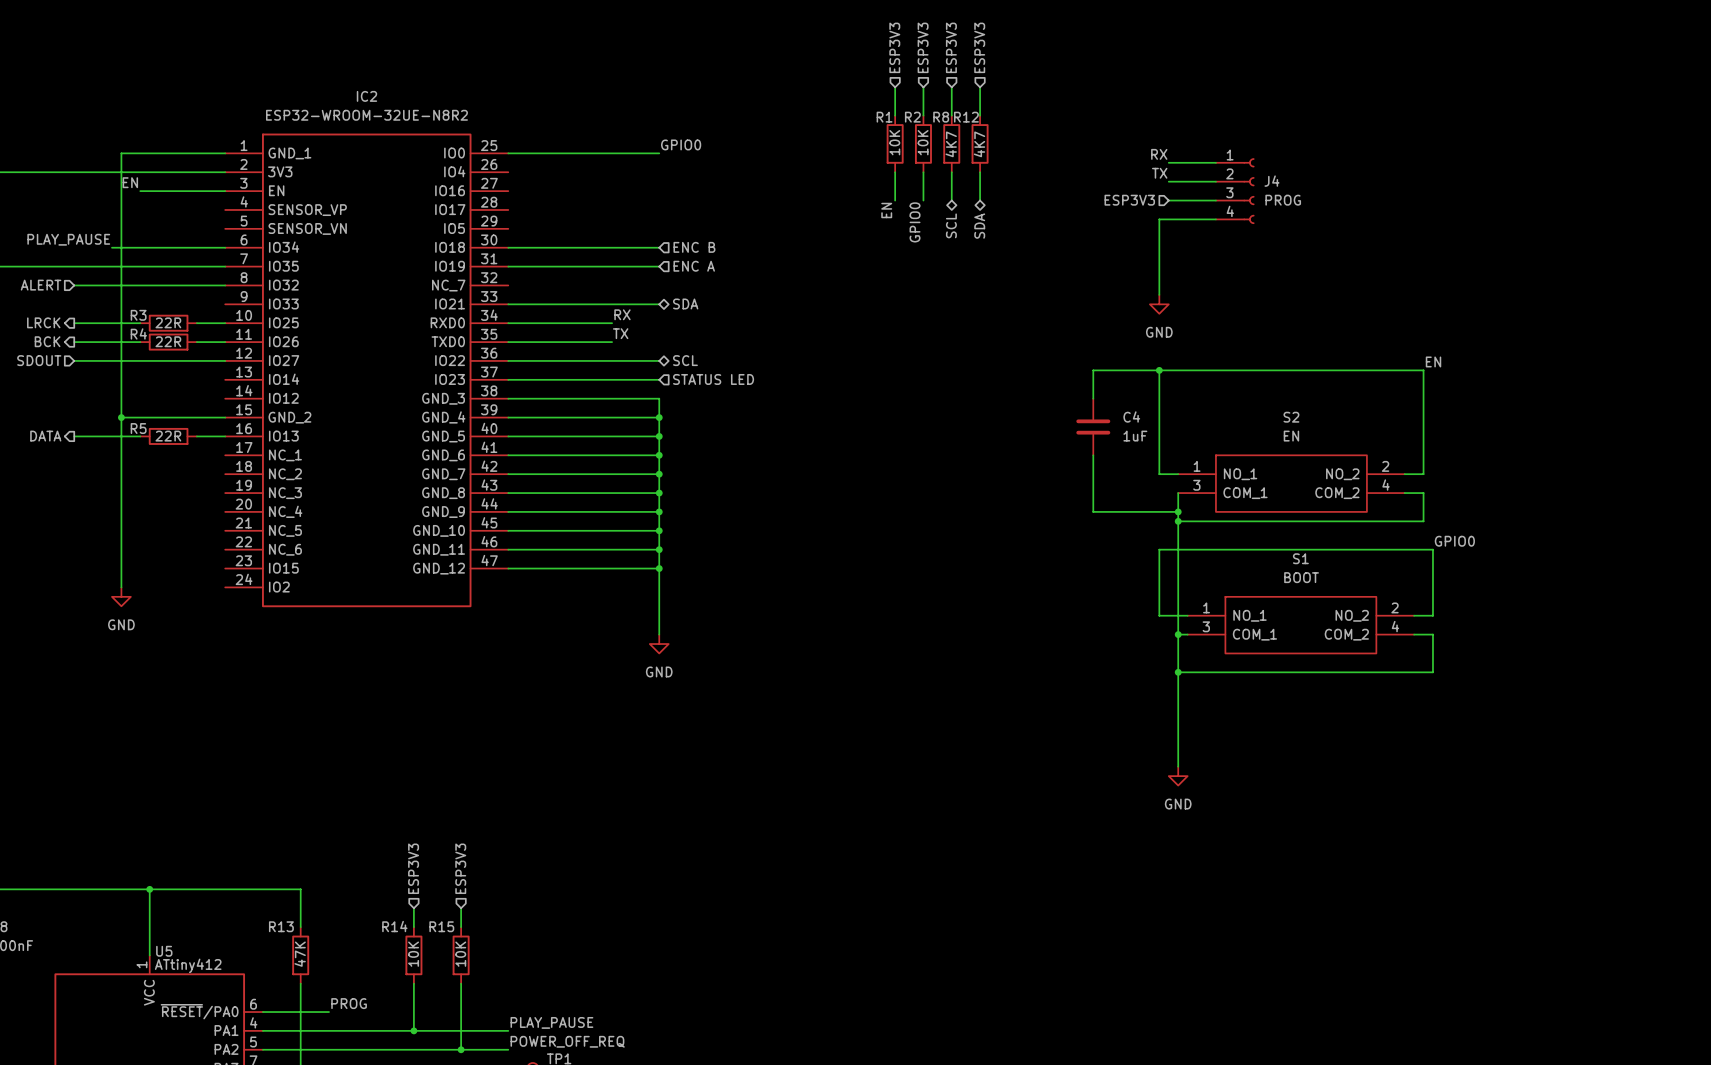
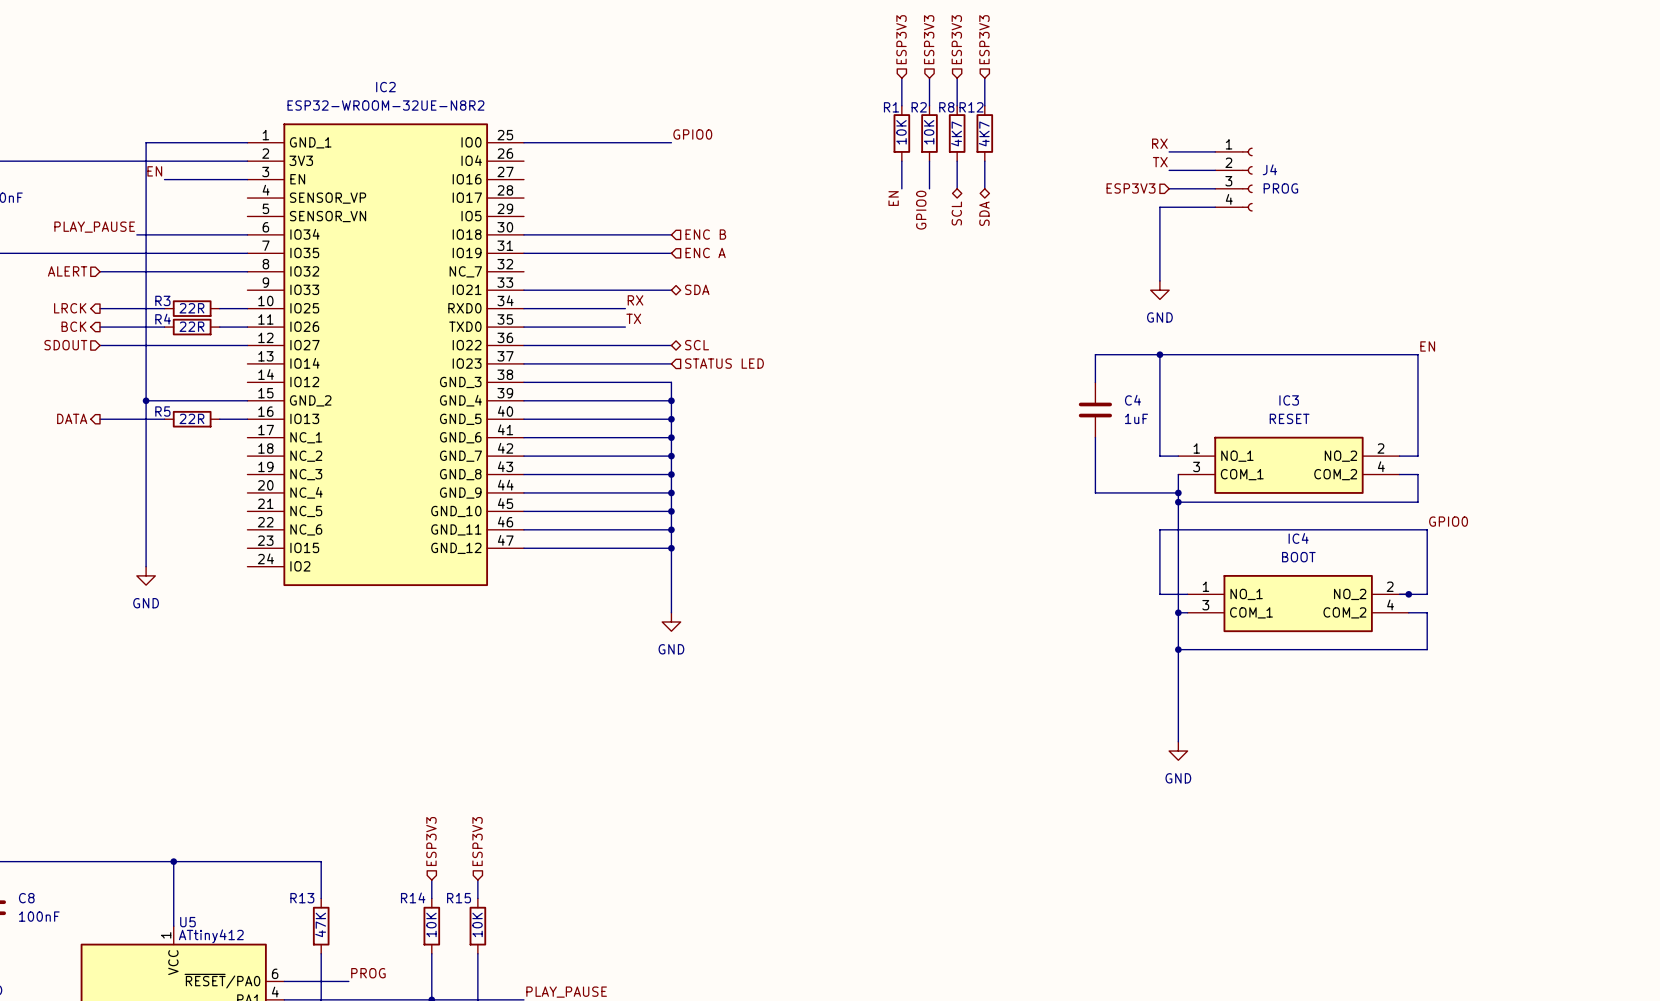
S2: EN (1291, 483) -> none
IC3: none -> RESET (1288, 465)
junction: none -> (1408, 594)
S1: BOOT (1300, 625) -> none
IC4: none -> BOOT (1298, 603)

